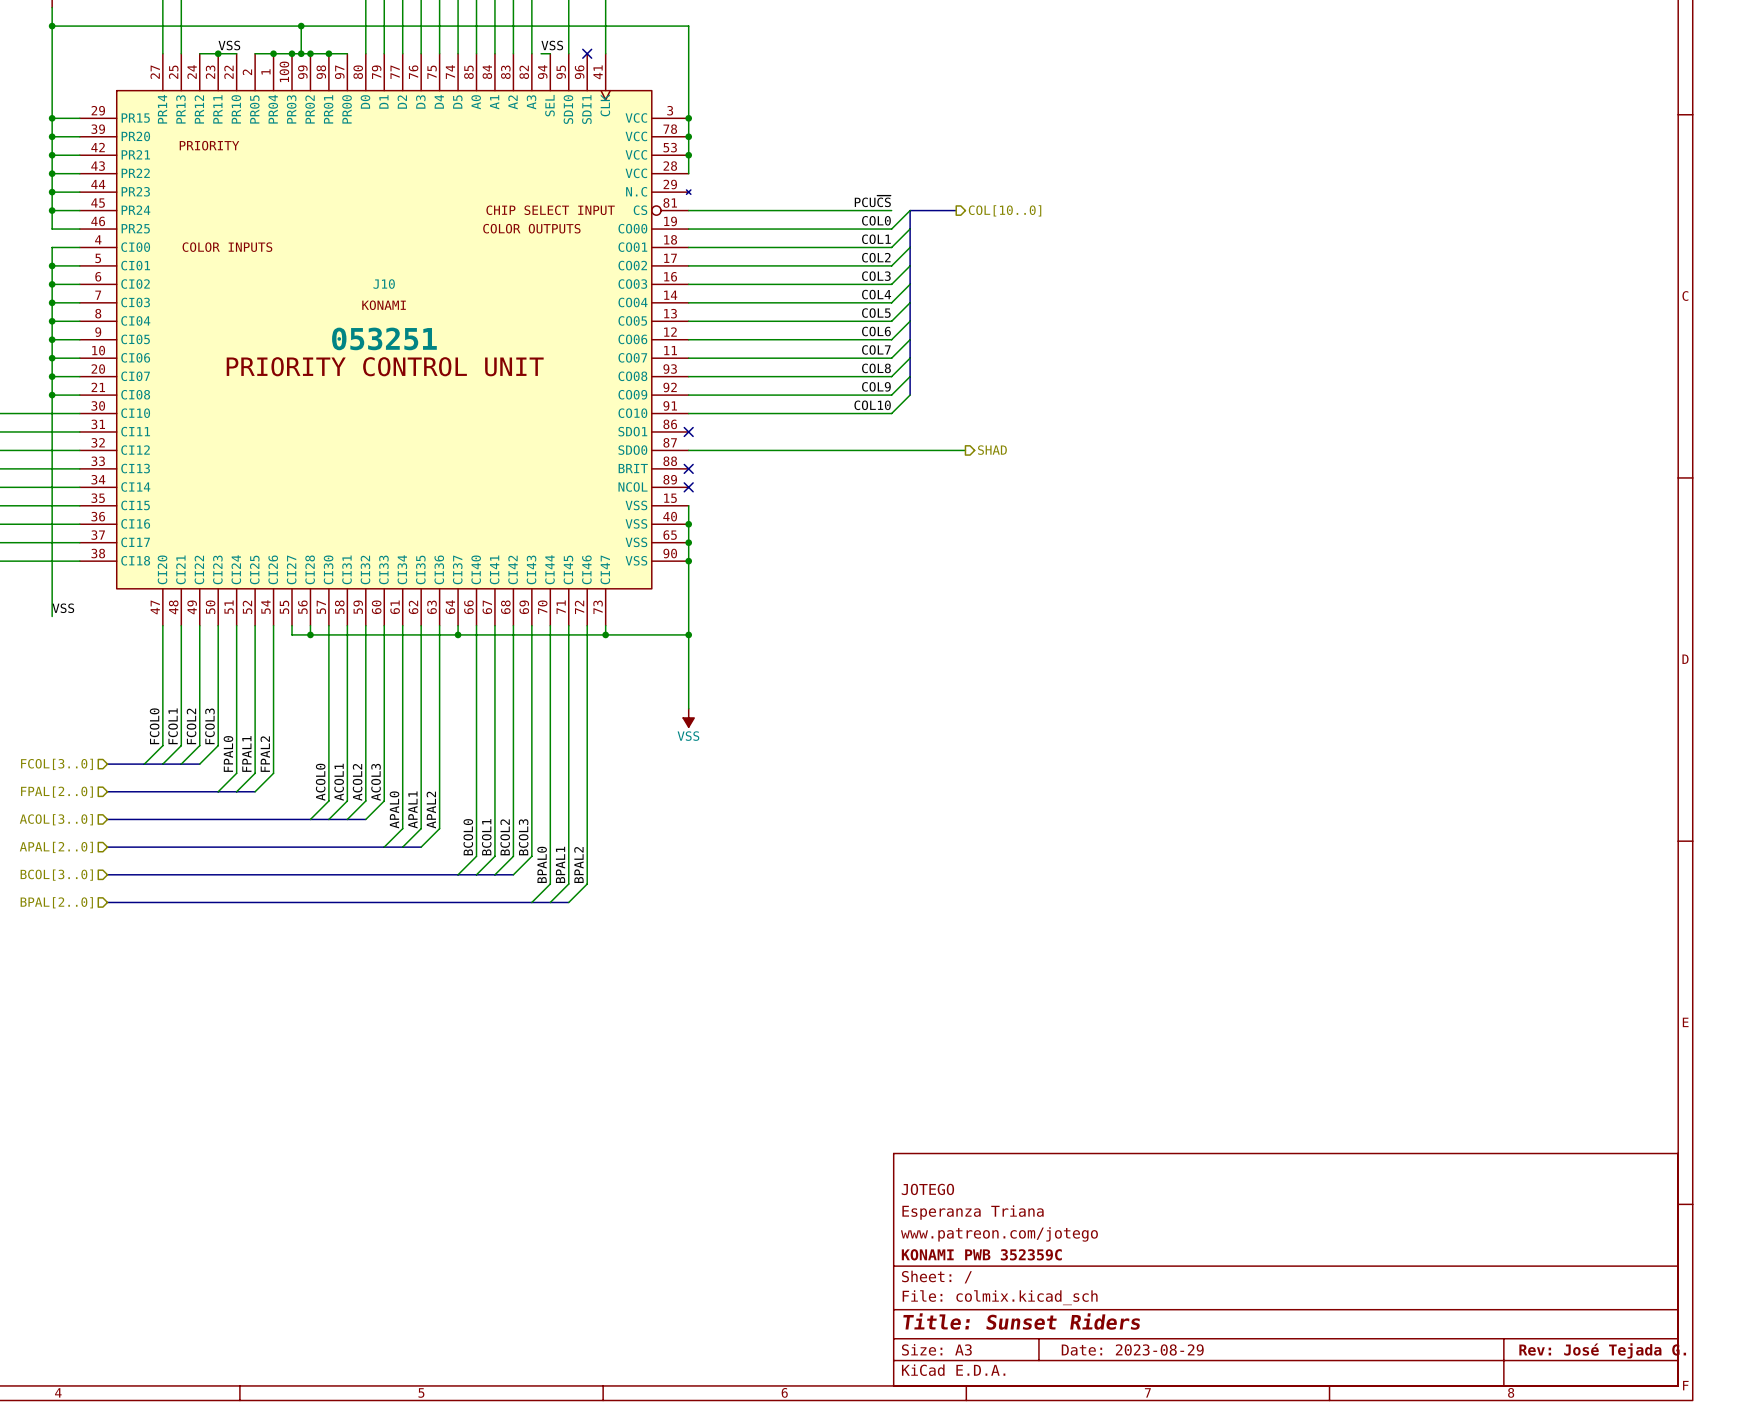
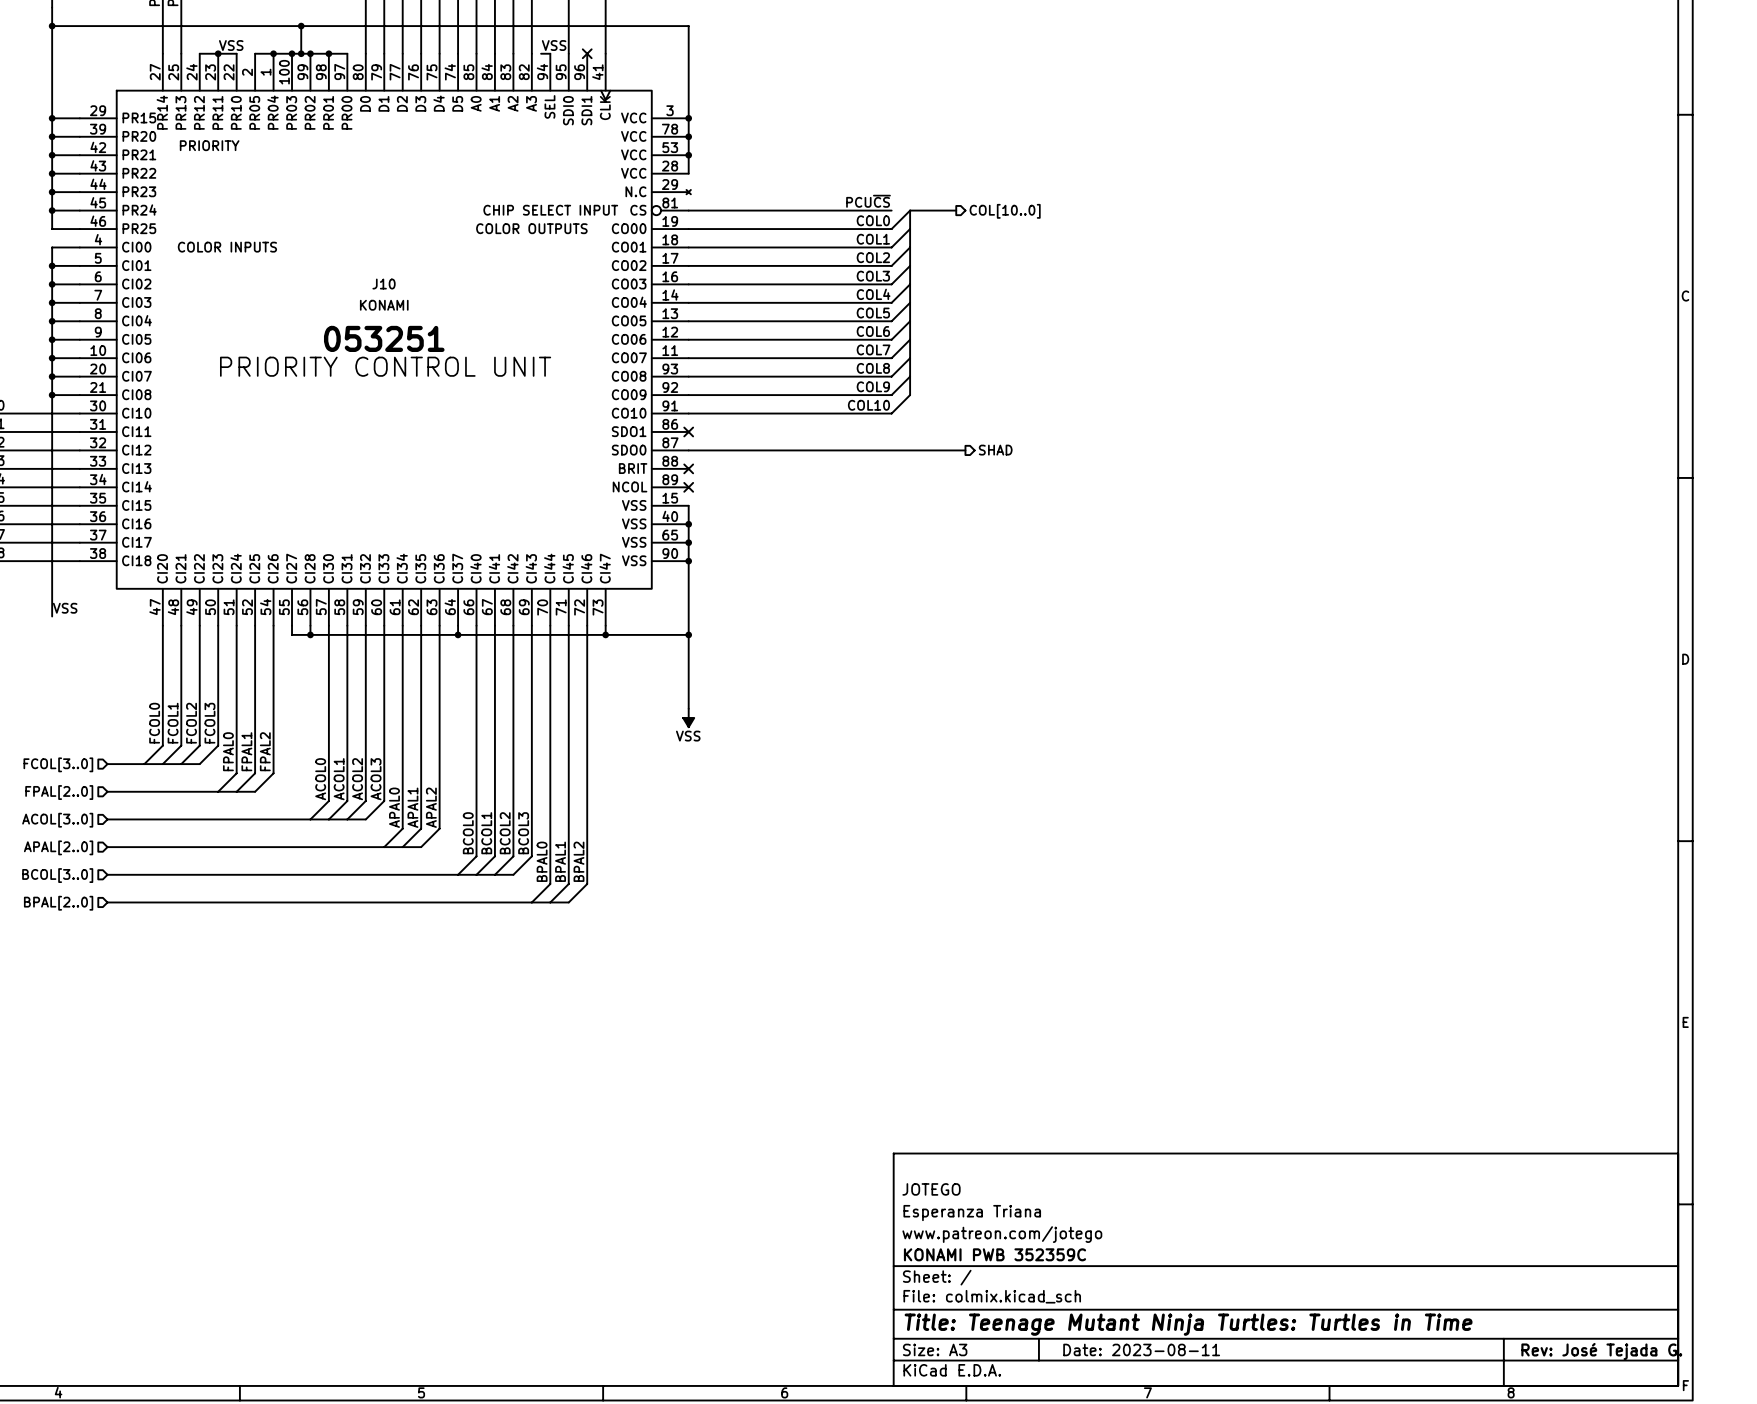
title block: Title: Sunset Riders (1021, 1321) -> Title: Teenage Mutant Ninja Turtles: Turtles in Time (1188, 1324)
title block: Date: 2023-08-29 (1132, 1349) -> Date: 2023-08-11 (1141, 1349)

